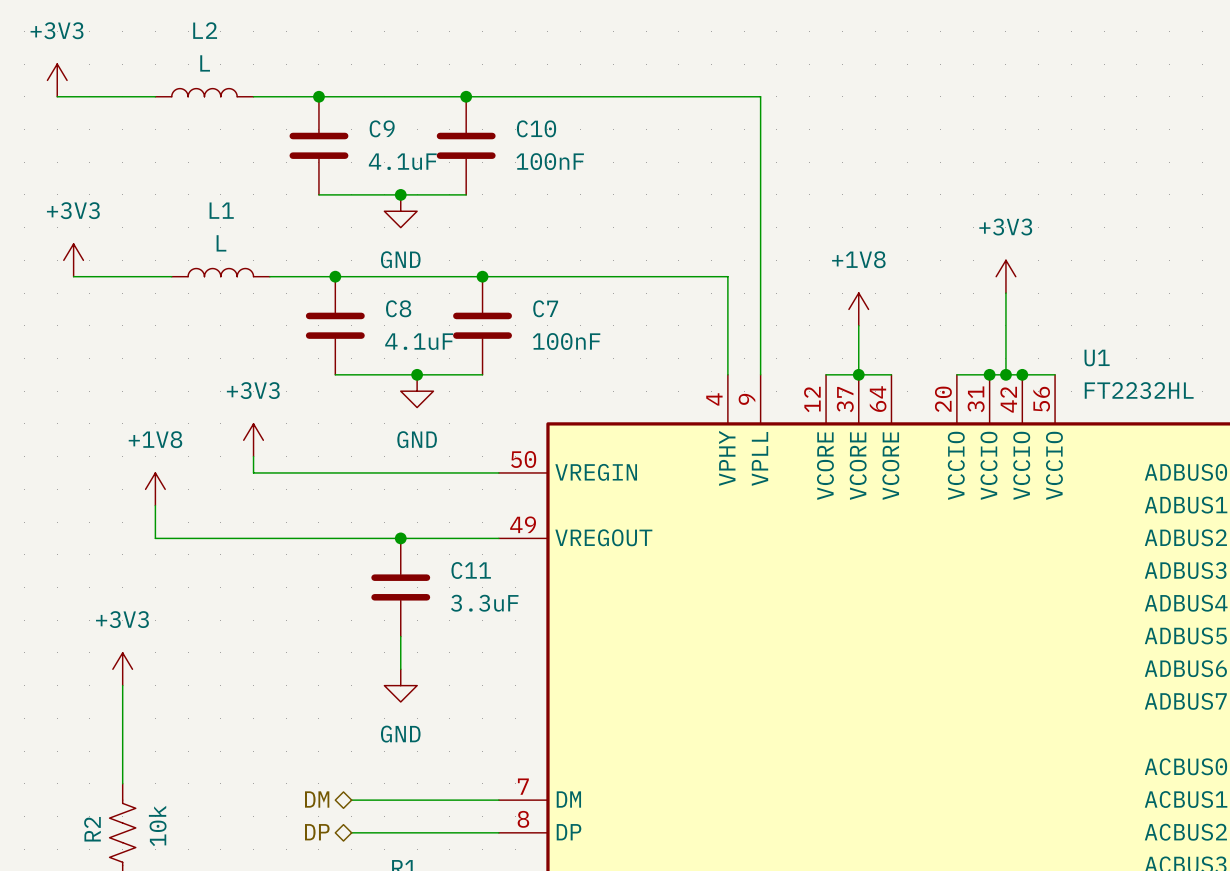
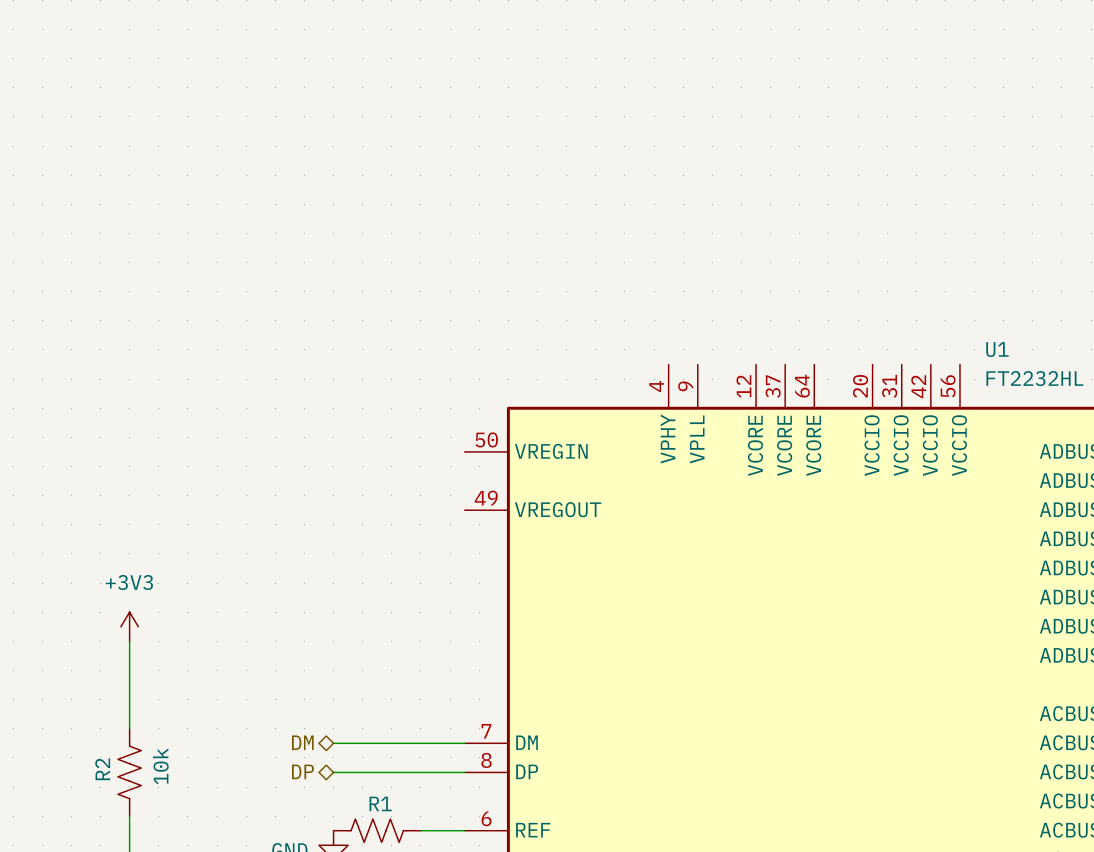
power symbol: +3V3 (57, 80) -> none
L2: L (204, 92) -> none
wire: (57, 96) (155, 96) -> none
wire: (253, 96) (760, 96) (760, 374) -> none
junction: (318, 96) -> none
junction: (466, 96) -> none
C9: 4.1uF (318, 145) -> none
C10: 100nF (466, 145) -> none
wire: (318, 194) (466, 194) -> none
junction: (400, 194) -> none
power symbol: GND (400, 211) -> none
power symbol: +3V3 (73, 260) -> none
L1: L (220, 272) -> none
wire: (73, 276) (171, 276) -> none
wire: (269, 276) (727, 276) (727, 374) -> none
junction: (335, 276) -> none
junction: (482, 276) -> none
power symbol: +3V3 (1005, 276) -> none
wire: (1005, 293) (1005, 374) -> none
power symbol: +1V8 (858, 309) -> none
C8: 4.1uF (335, 325) -> none
C7: 100nF (482, 325) -> none
wire: (858, 325) (858, 374) -> none
wire: (335, 374) (482, 374) -> none
junction: (417, 374) -> none
wire: (826, 374) (891, 374) -> none
junction: (858, 374) -> none
wire: (956, 374) (1055, 374) -> none
junction: (989, 374) -> none
junction: (1005, 374) -> none
junction: (1022, 374) -> none
power symbol: GND (417, 391) -> none
power symbol: +3V3 (253, 440) -> none
wire: (253, 456) (253, 472) (498, 472) -> none
power symbol: +1V8 (155, 489) -> none
wire: (155, 505) (155, 538) (498, 538) -> none
junction: (400, 538) -> none
C11: 3.3uF (400, 587) -> none
wire: (400, 636) (400, 669) -> none
power symbol: GND (400, 685) -> none

